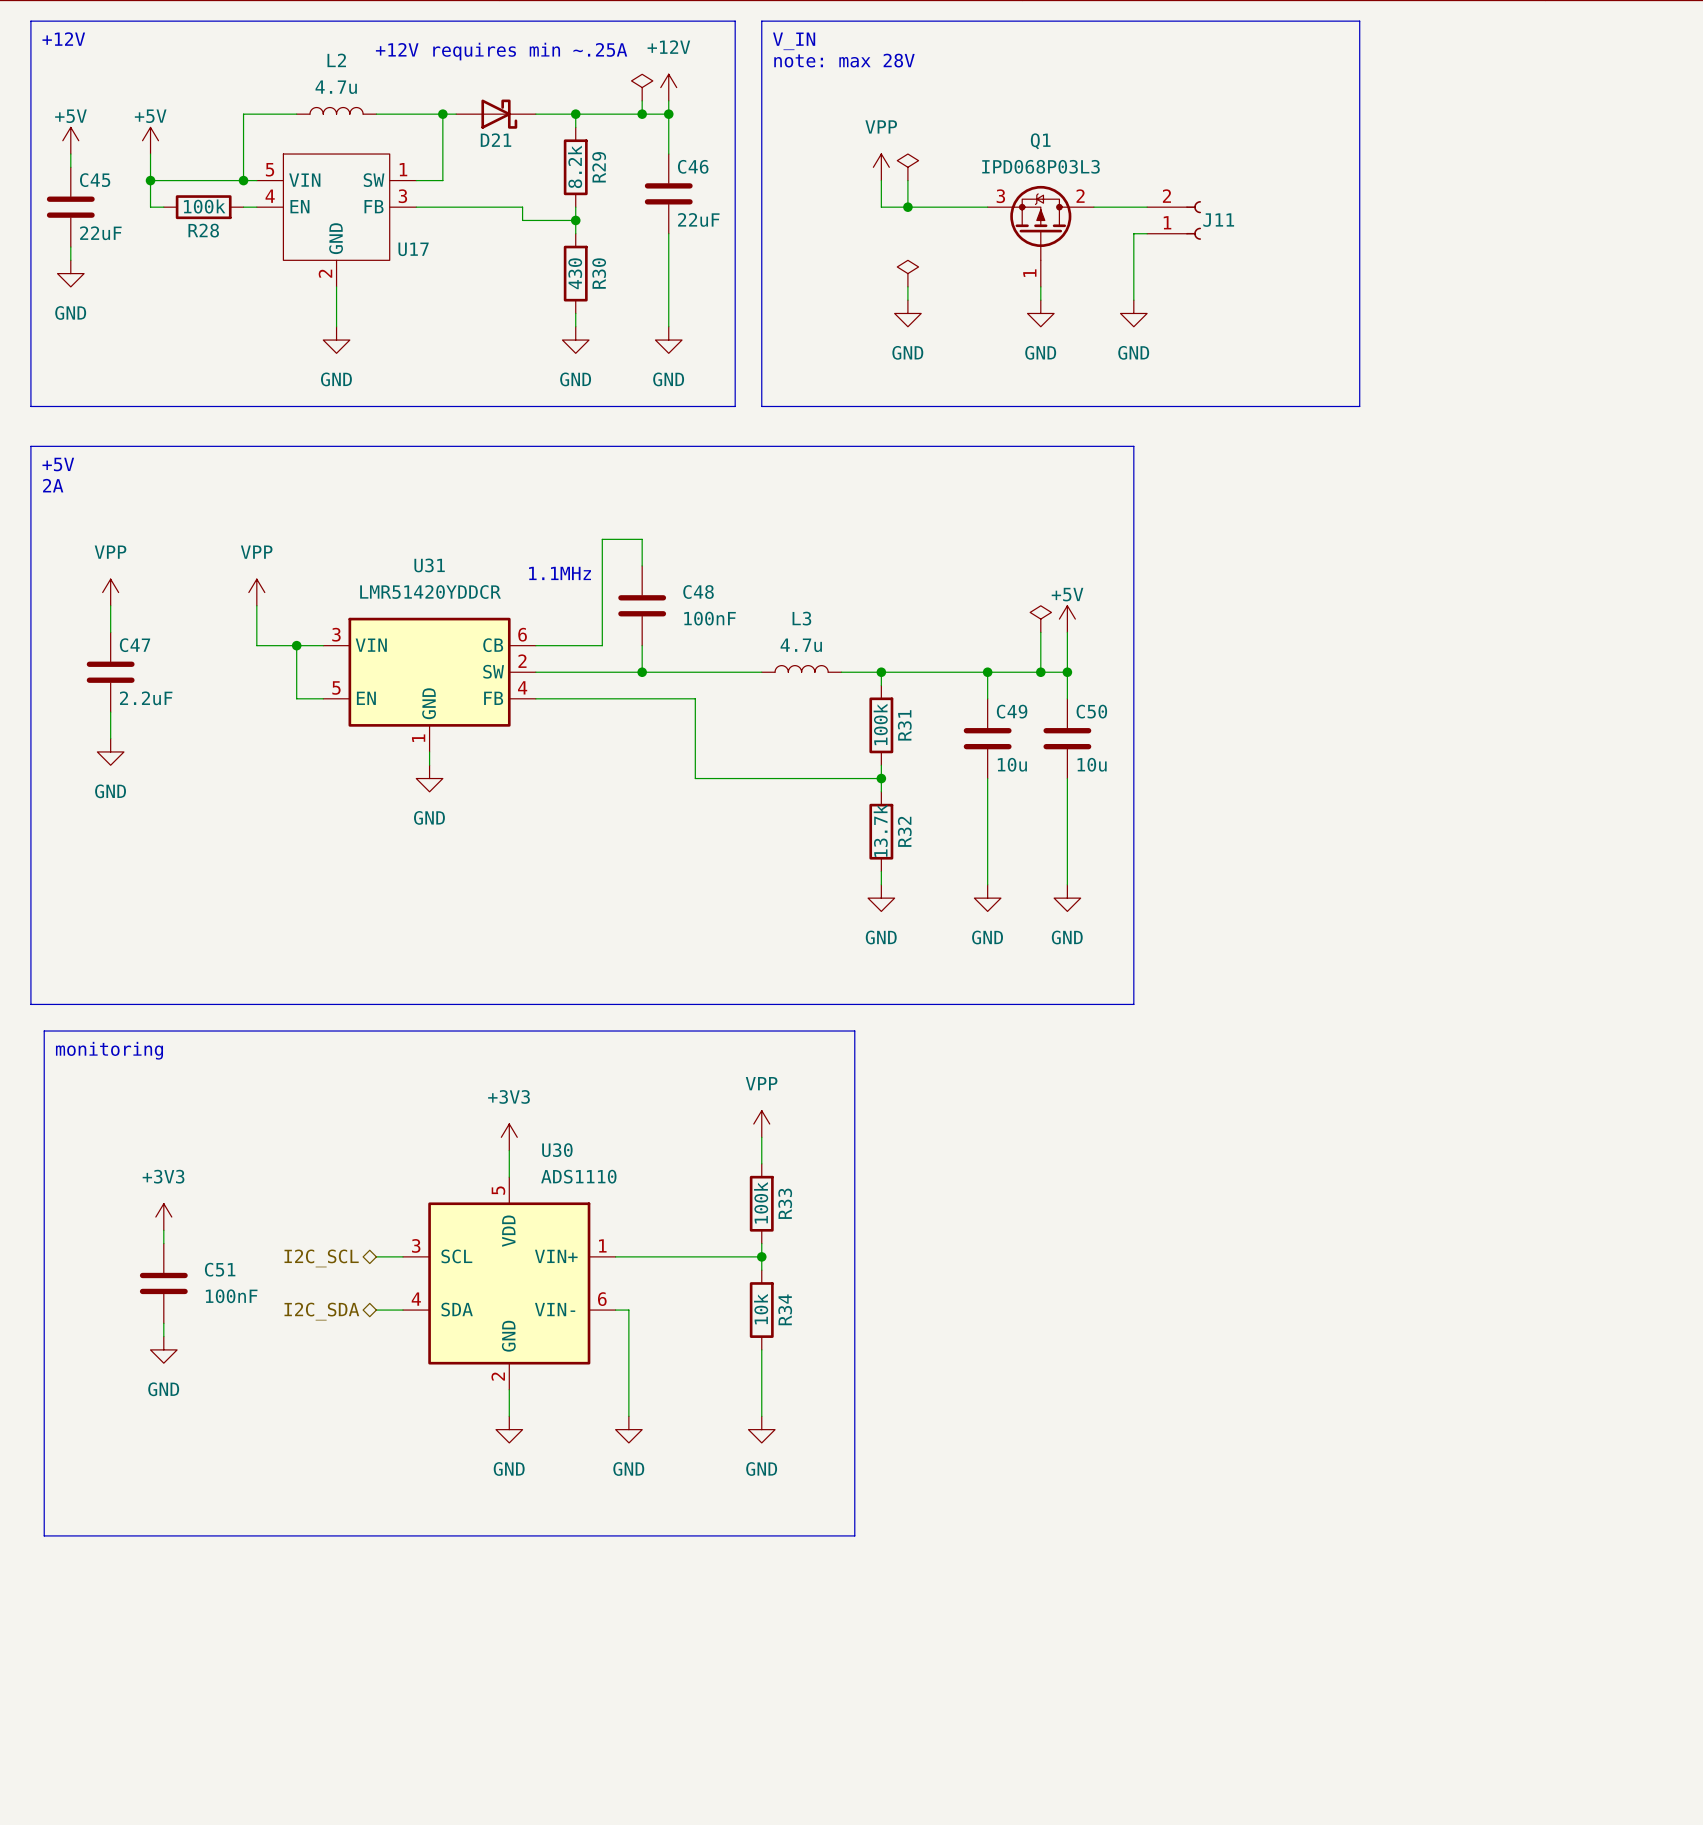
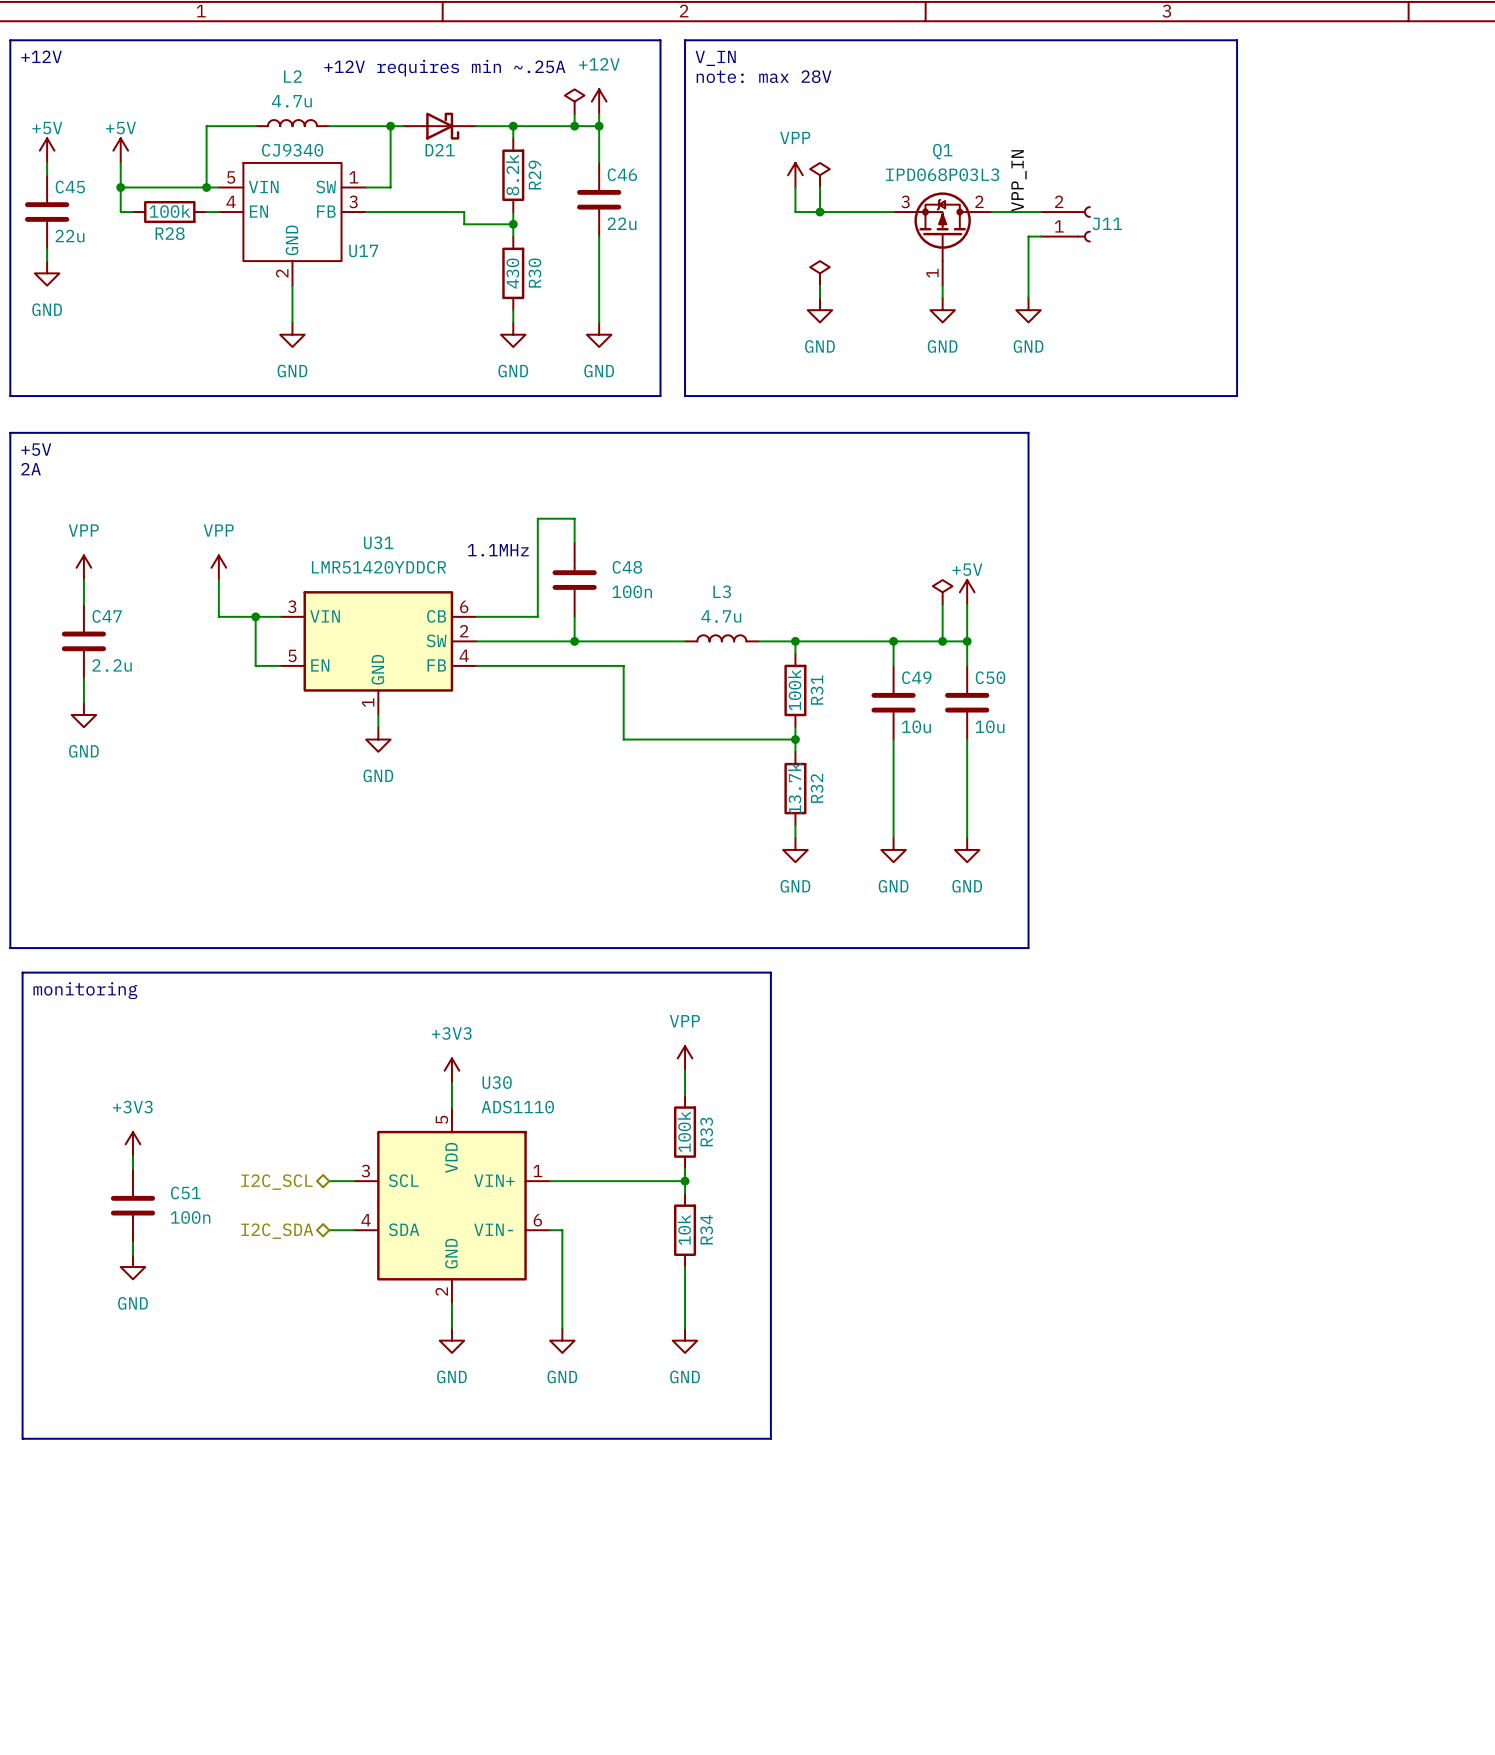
U17 value: none -> CJ9340 (292, 150)
label: none -> VPP_IN (1019, 180)
C46 value: 22uF (698, 219) -> 22u (622, 223)
C45 value: 22uF (100, 233) -> 22u (70, 236)
C48 value: 100nF (710, 618) -> 100n (632, 591)
C47 value: 2.2uF (146, 698) -> 2.2u (112, 665)
C51 value: 100nF (231, 1296) -> 100n (190, 1217)

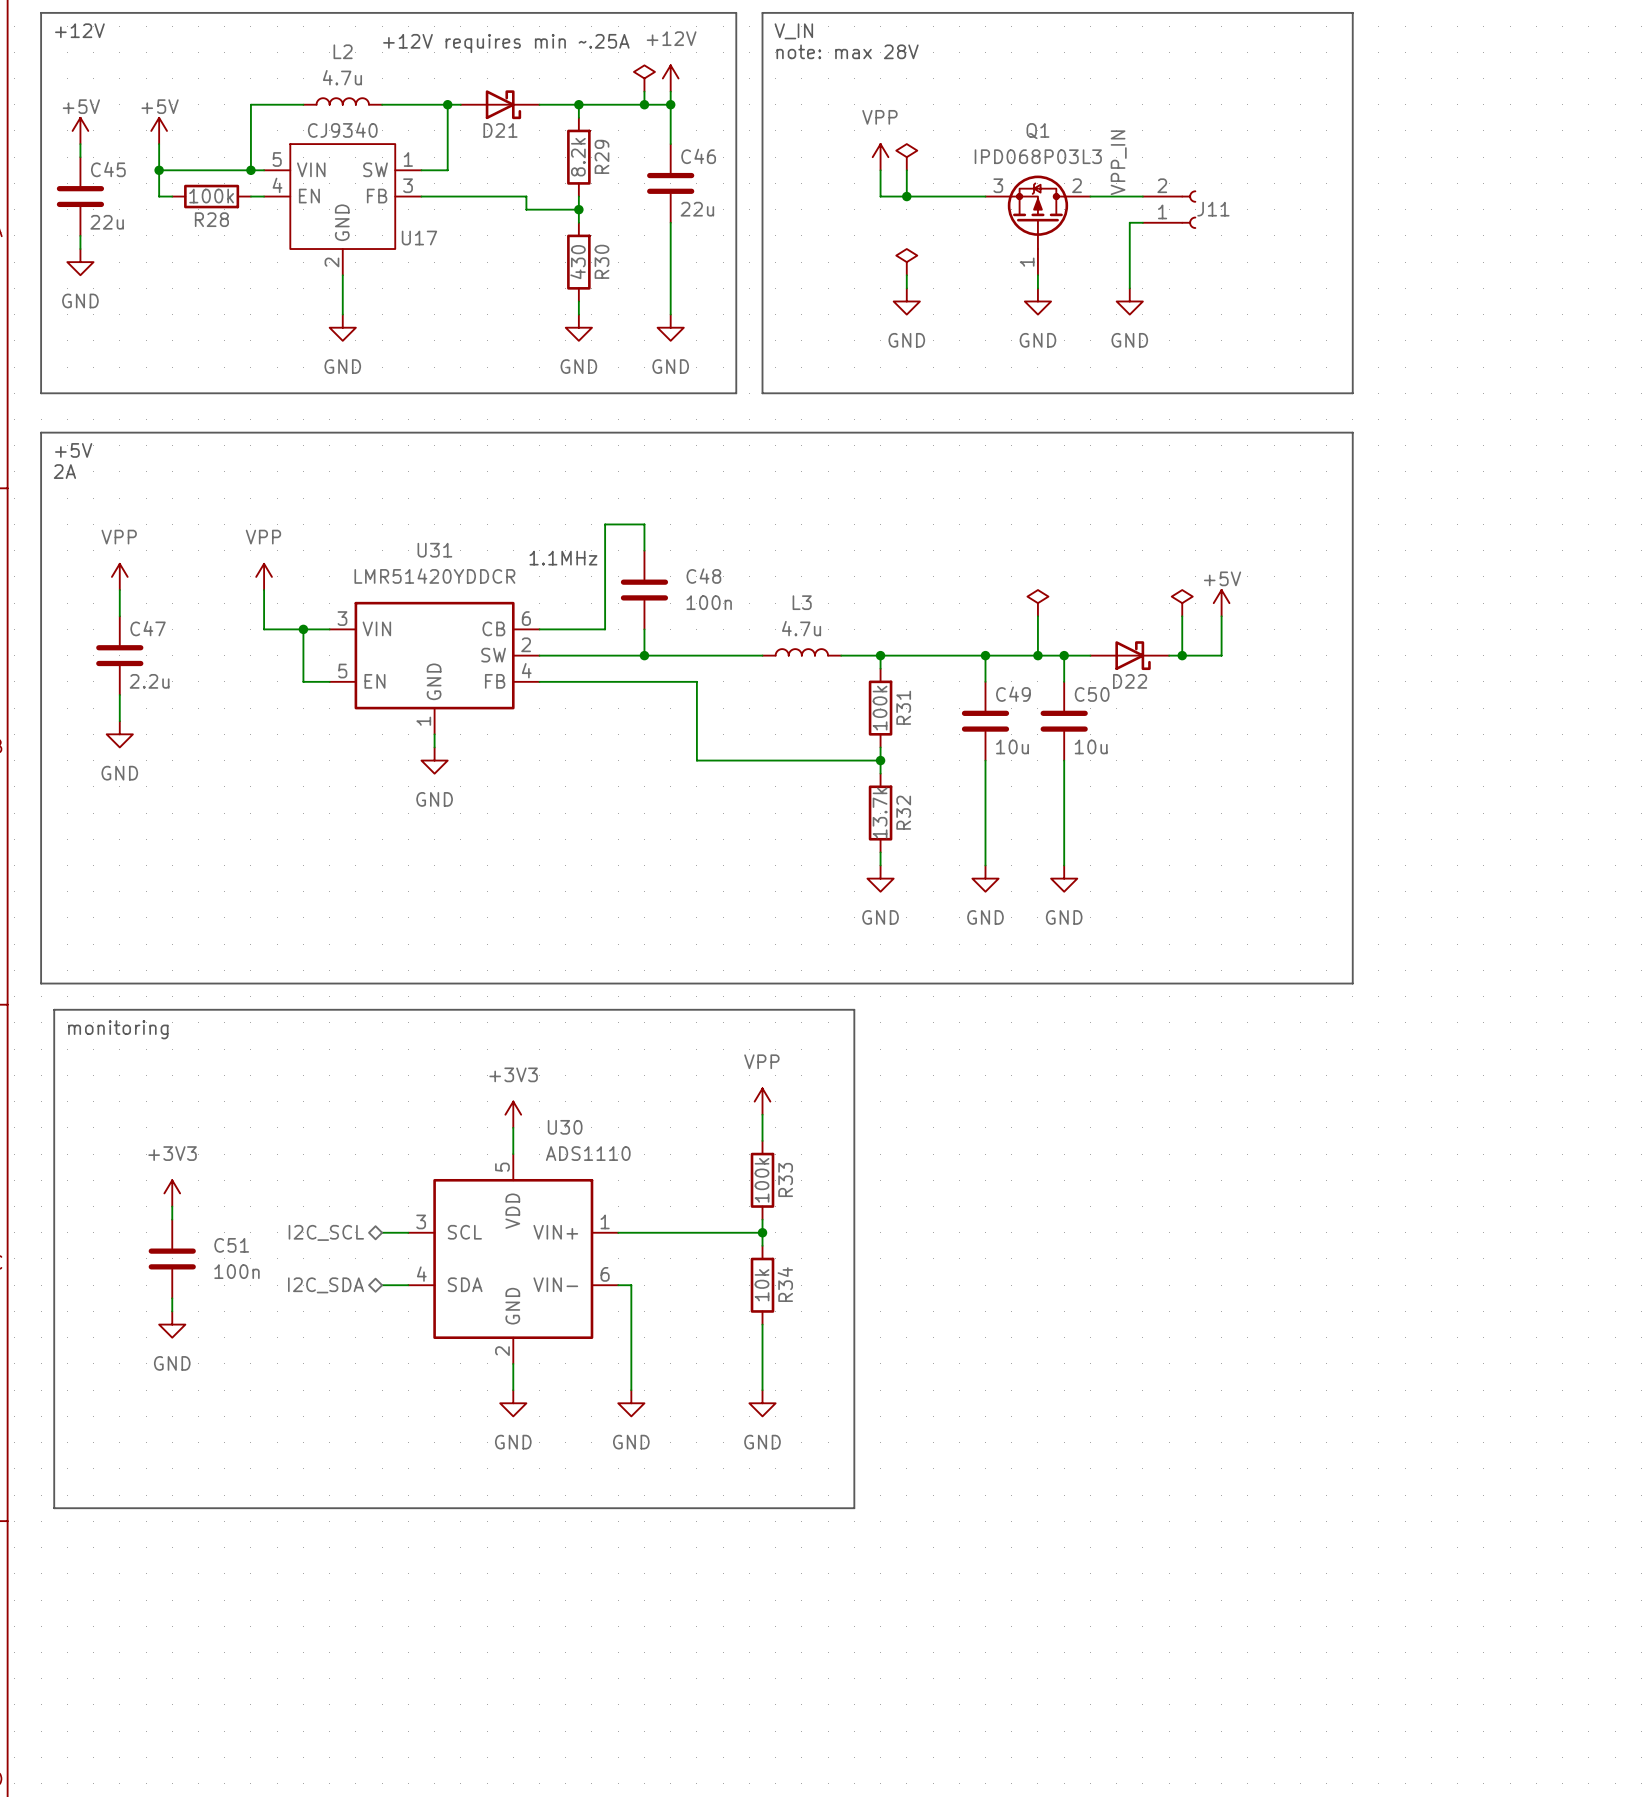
line: (1028, 432) (1028, 948) -> (1129, 432) (1352, 432) (1352, 983) (1129, 983)
power symbol position: +5V (967, 592) -> +5V (1221, 603)
power symbol: none -> (1182, 603)
wire: (967, 604) (967, 641) -> (1090, 655) (1064, 655)
wire: none -> (1182, 616) (1182, 655)
wire: none -> (1221, 616) (1221, 655) (1169, 655)
D22: none -> (1129, 655)
junction: none -> (1182, 655)

